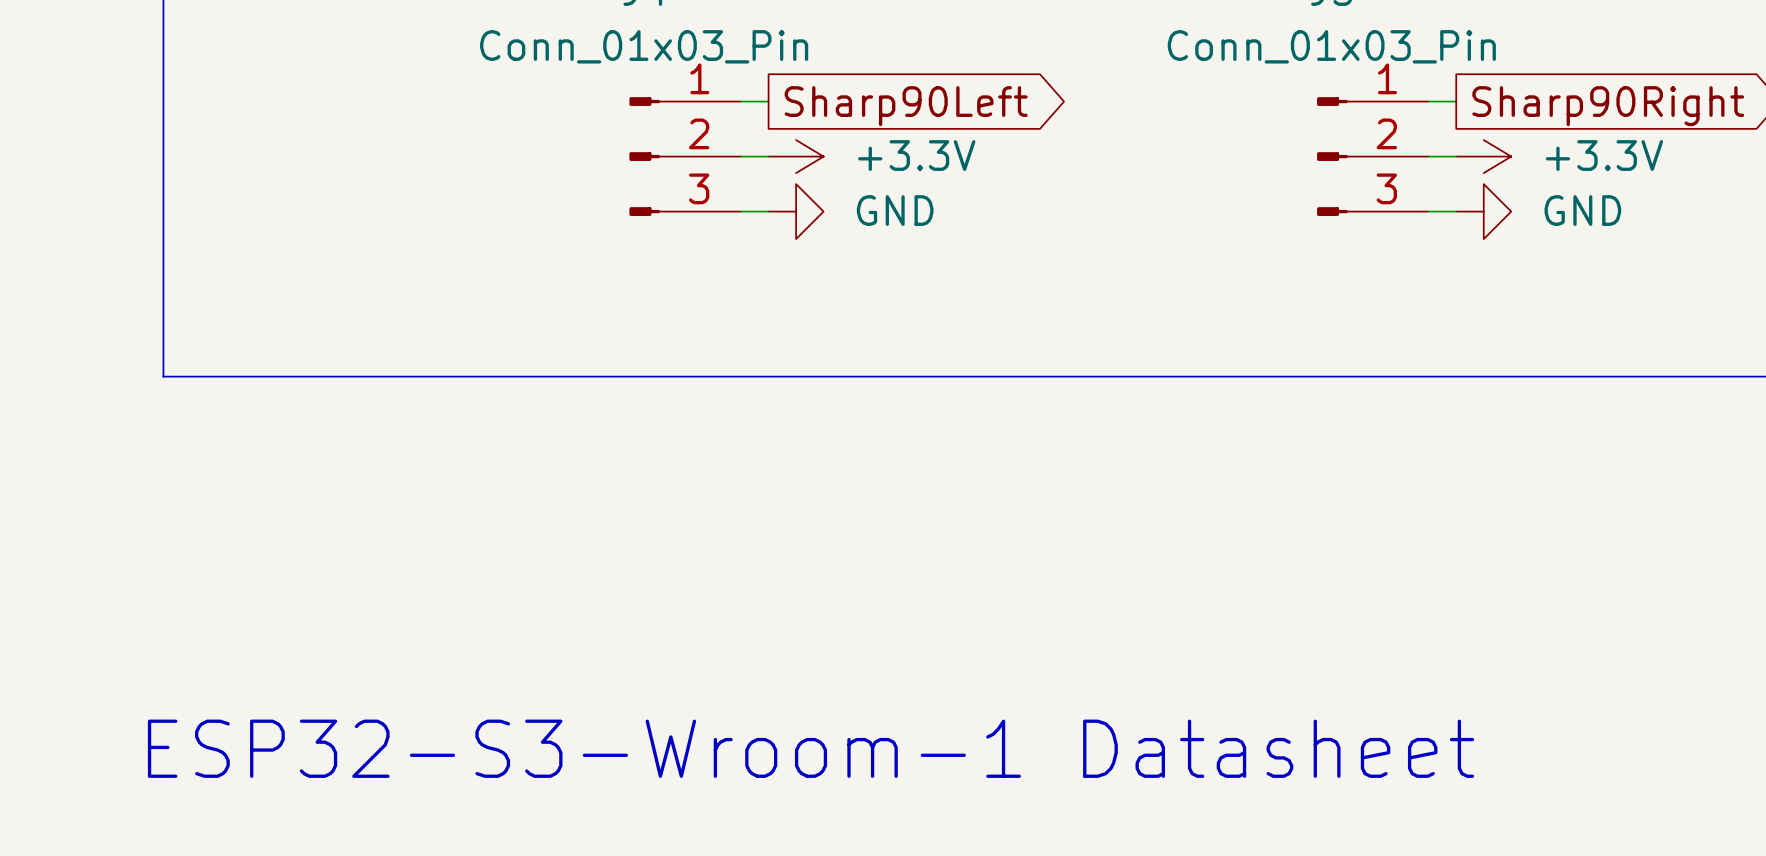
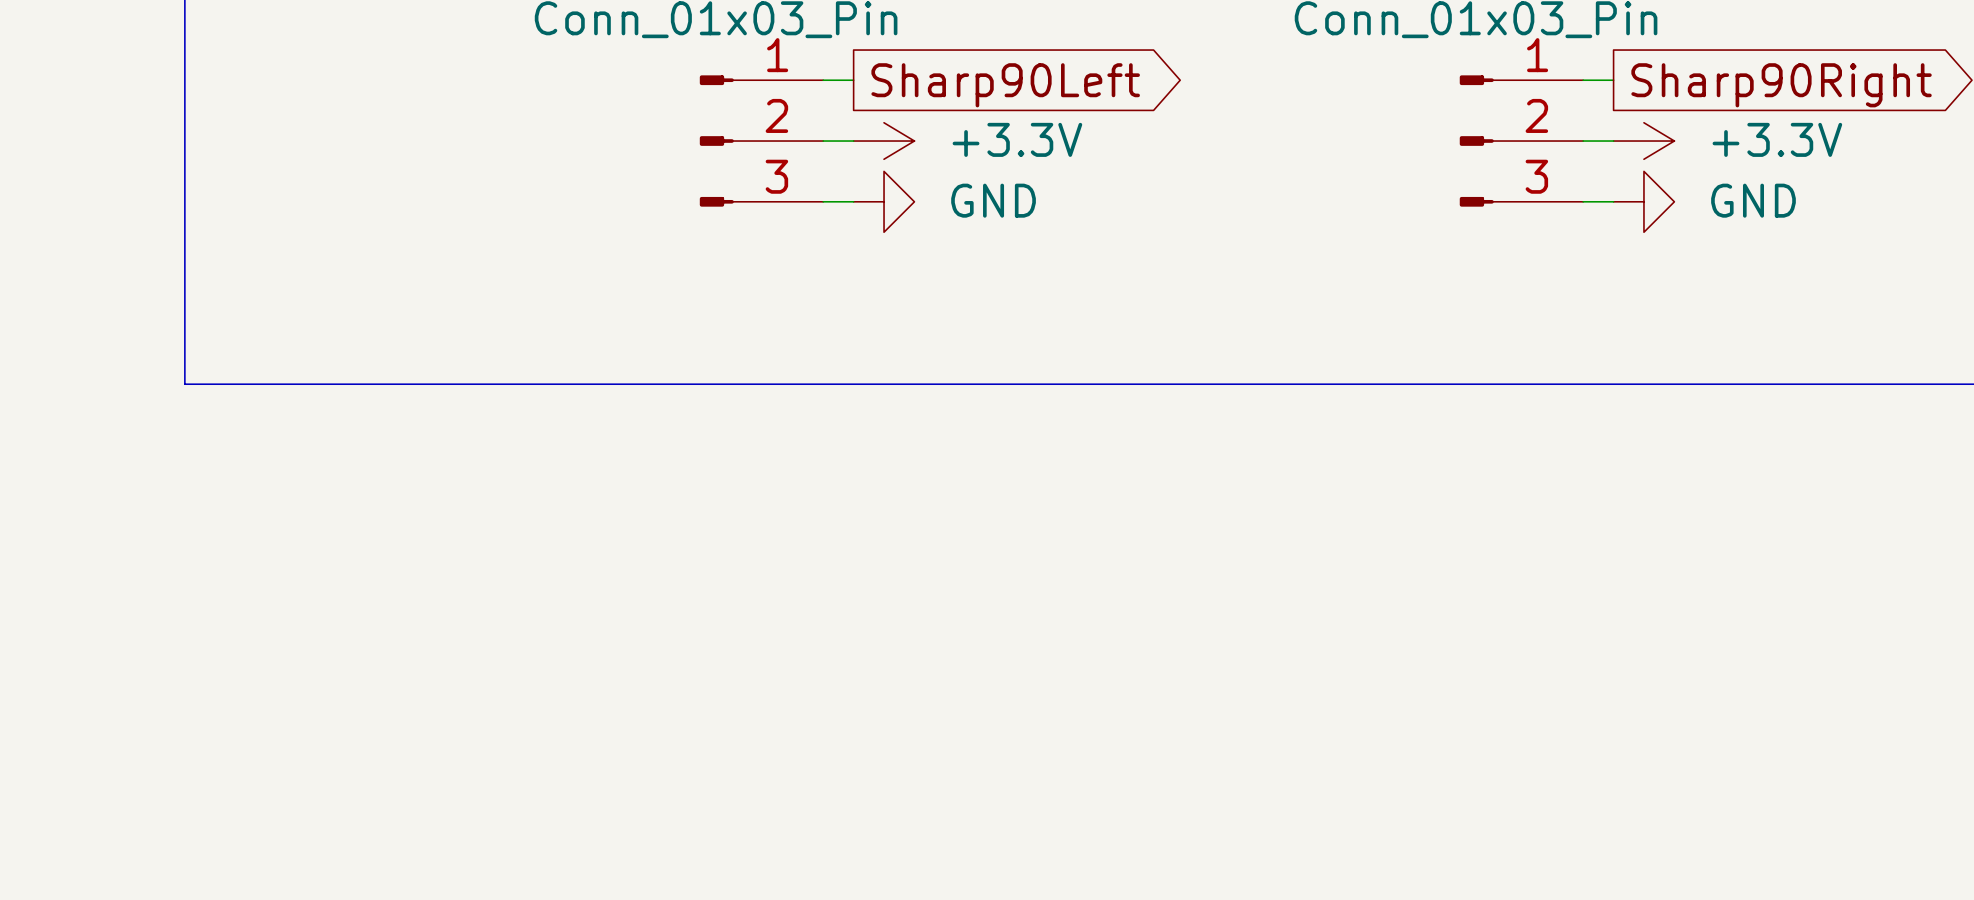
text: ESP32-S3-Wroom-1 Datasheet (811, 748) -> none

